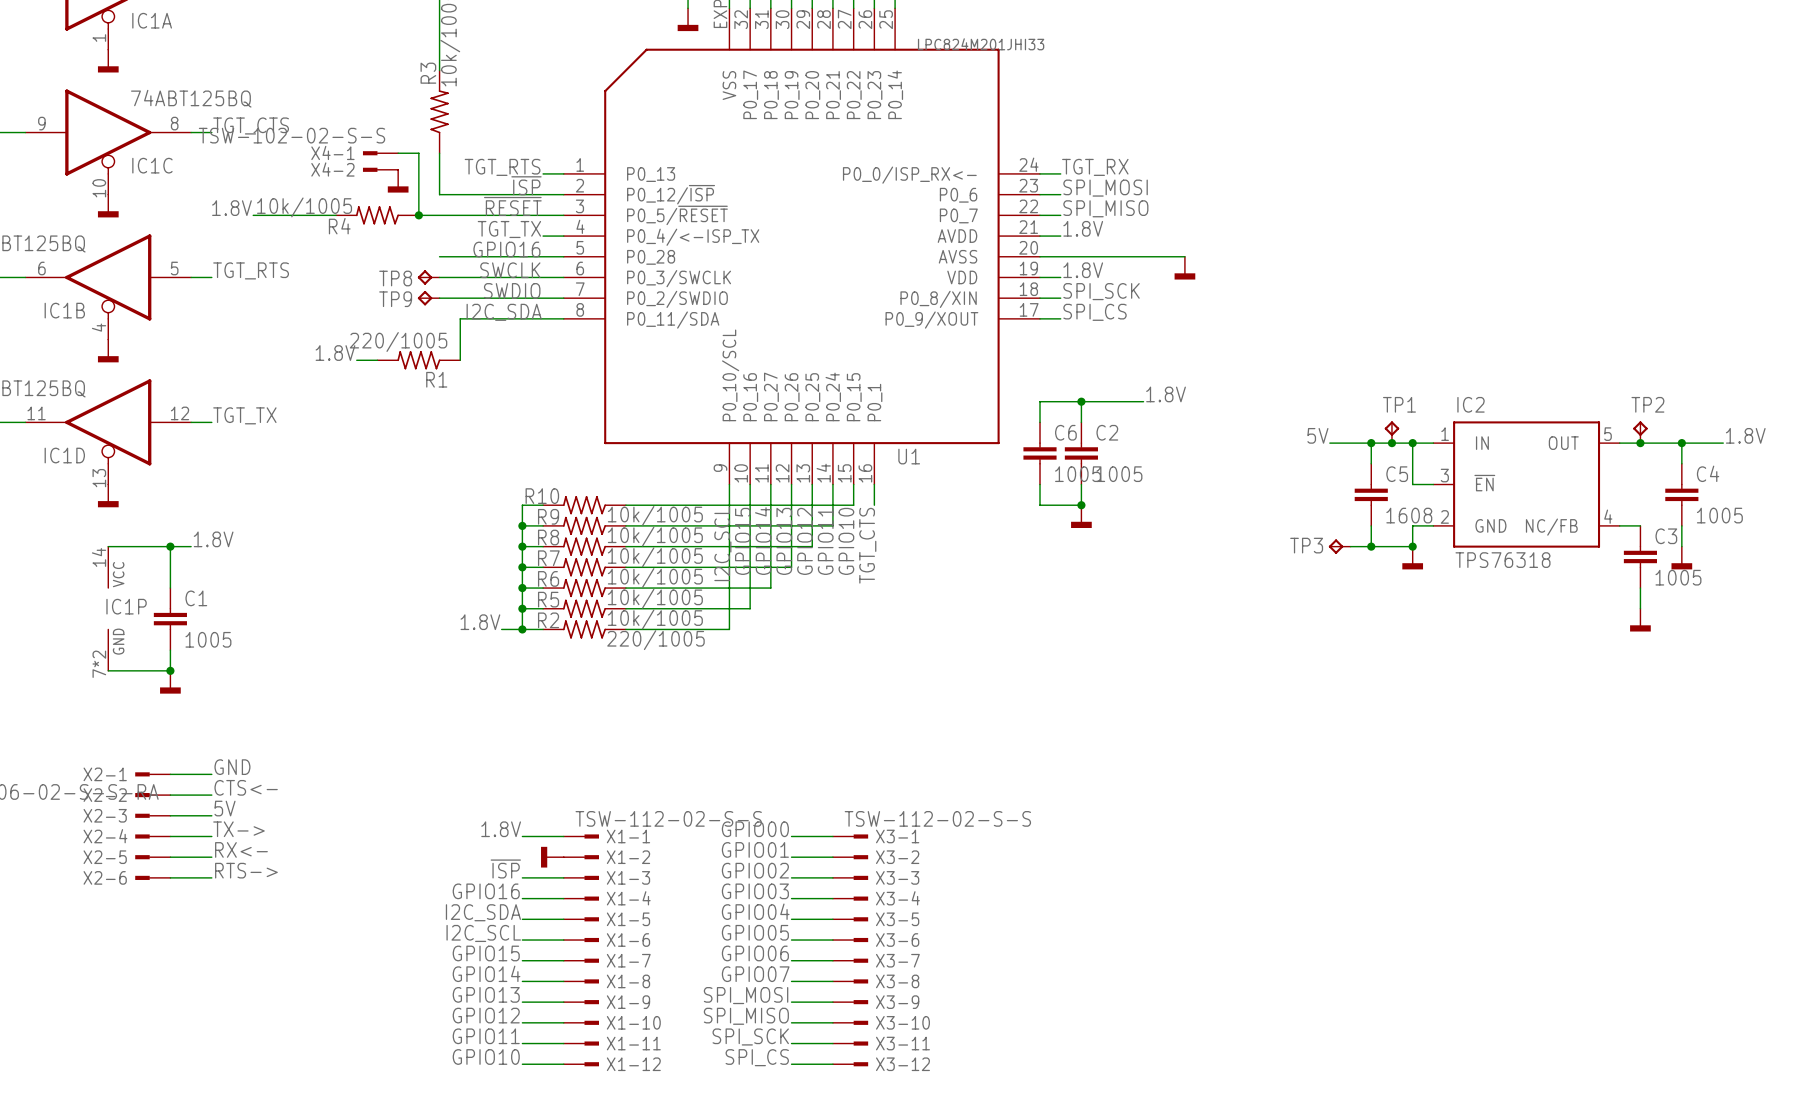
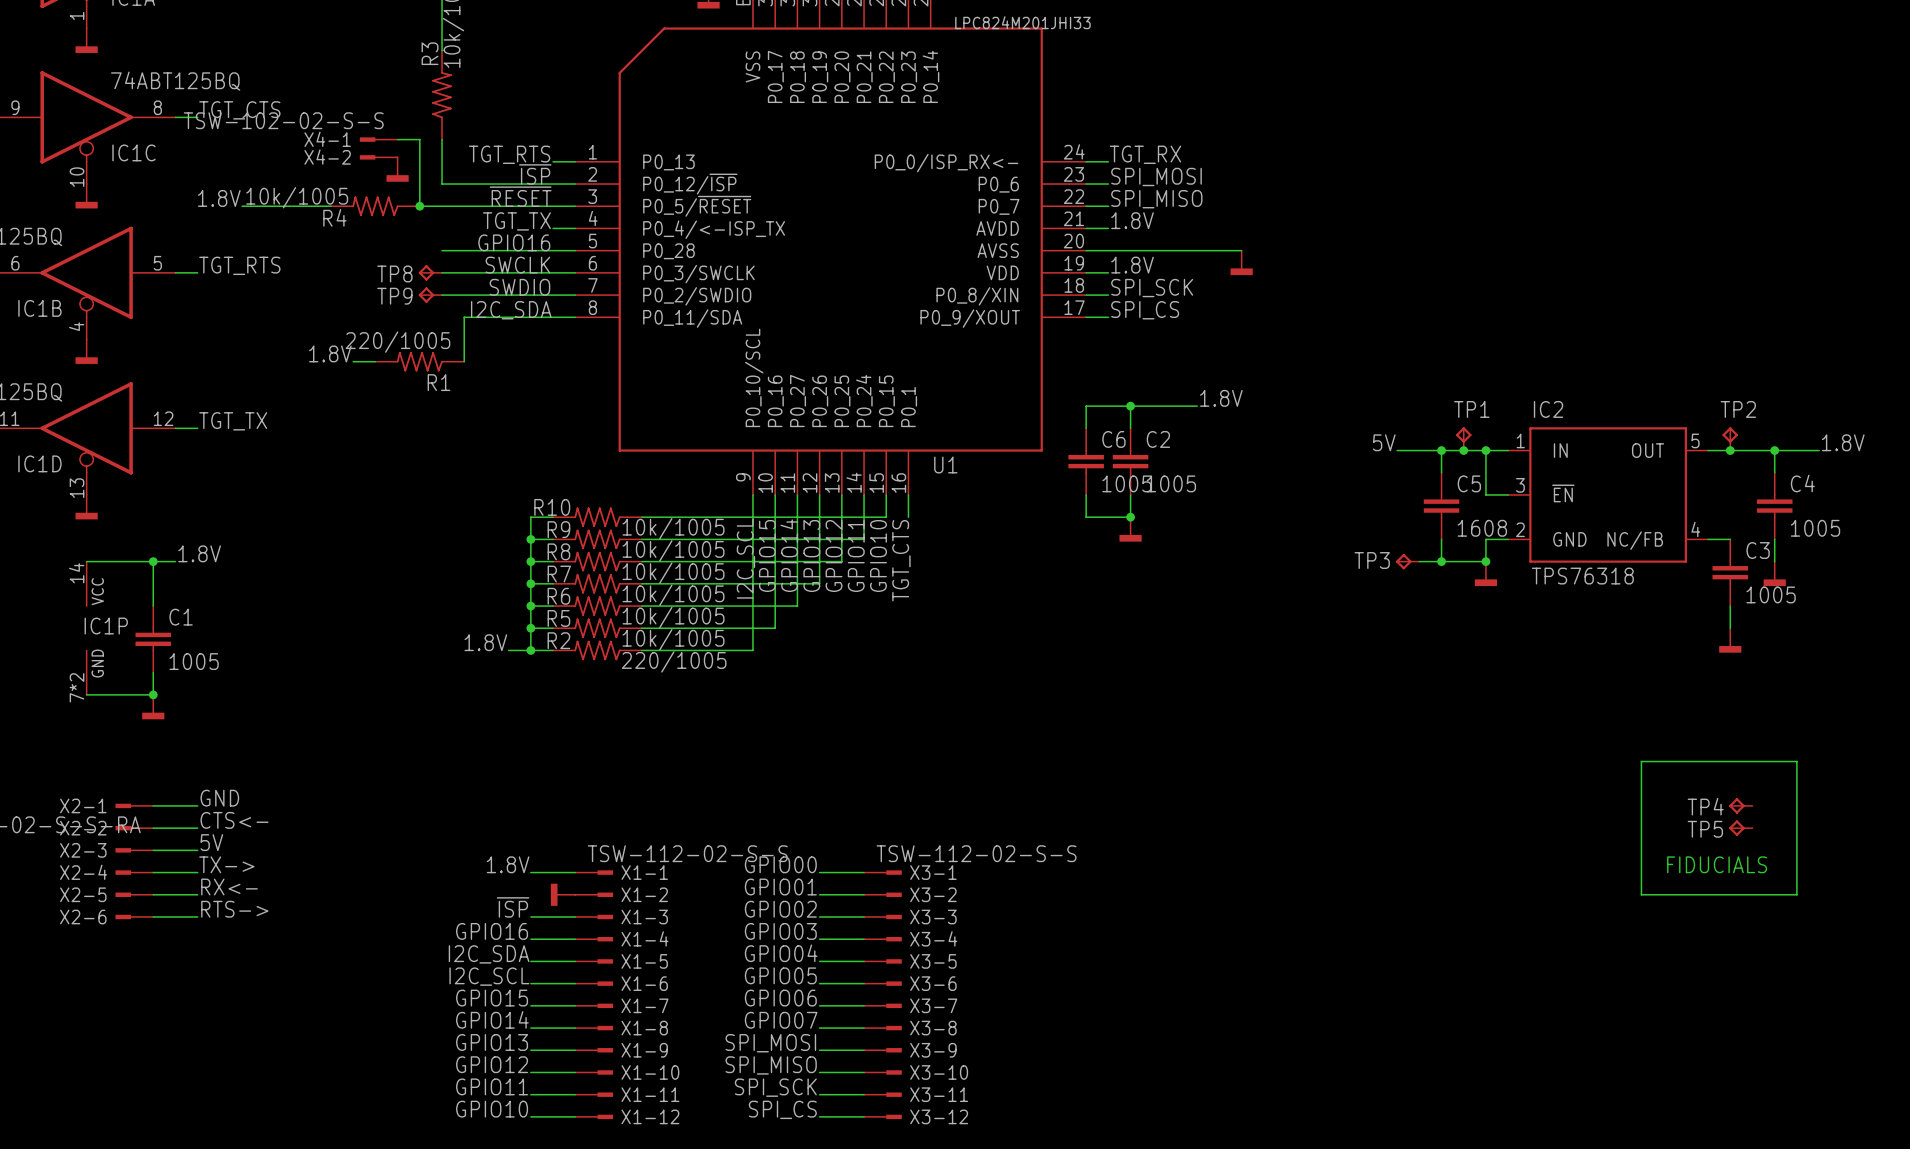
wire: none -> (1641, 761) (1796, 761) (1796, 894) (1641, 894) (1641, 761)
TP4: none -> (1740, 805)
TP5: none -> (1740, 828)
text: none -> FIDUCIALS (1717, 864)

